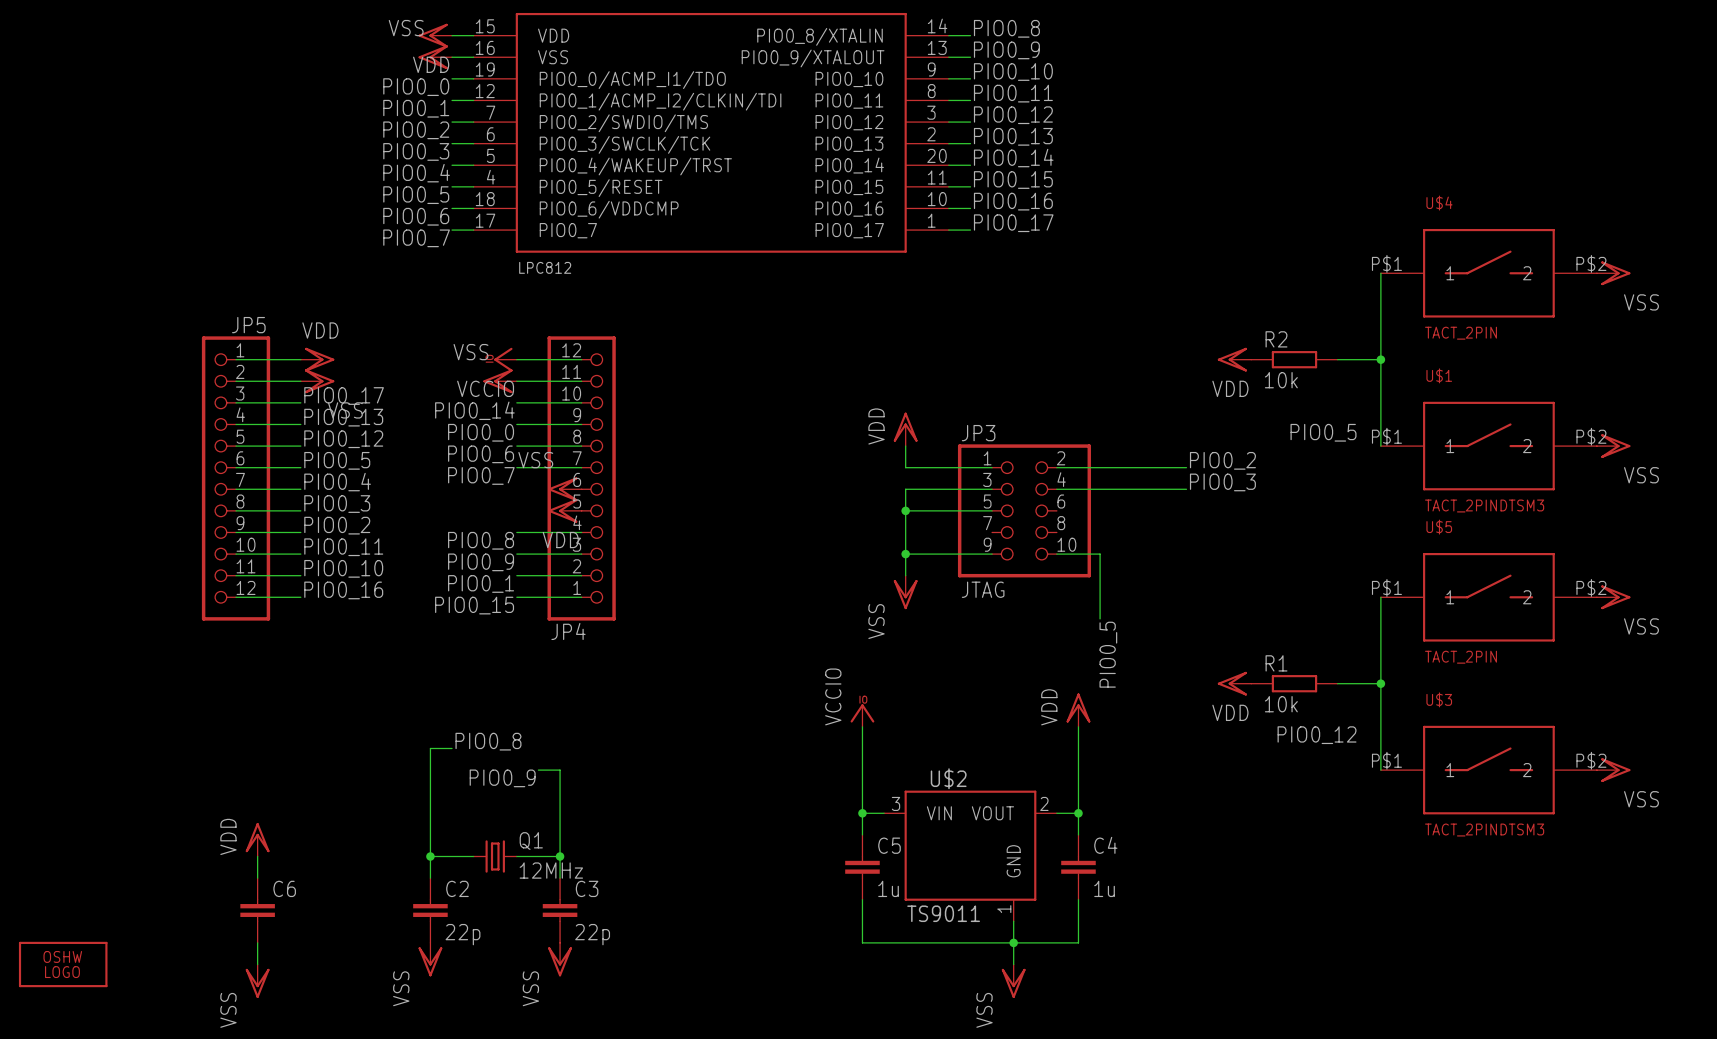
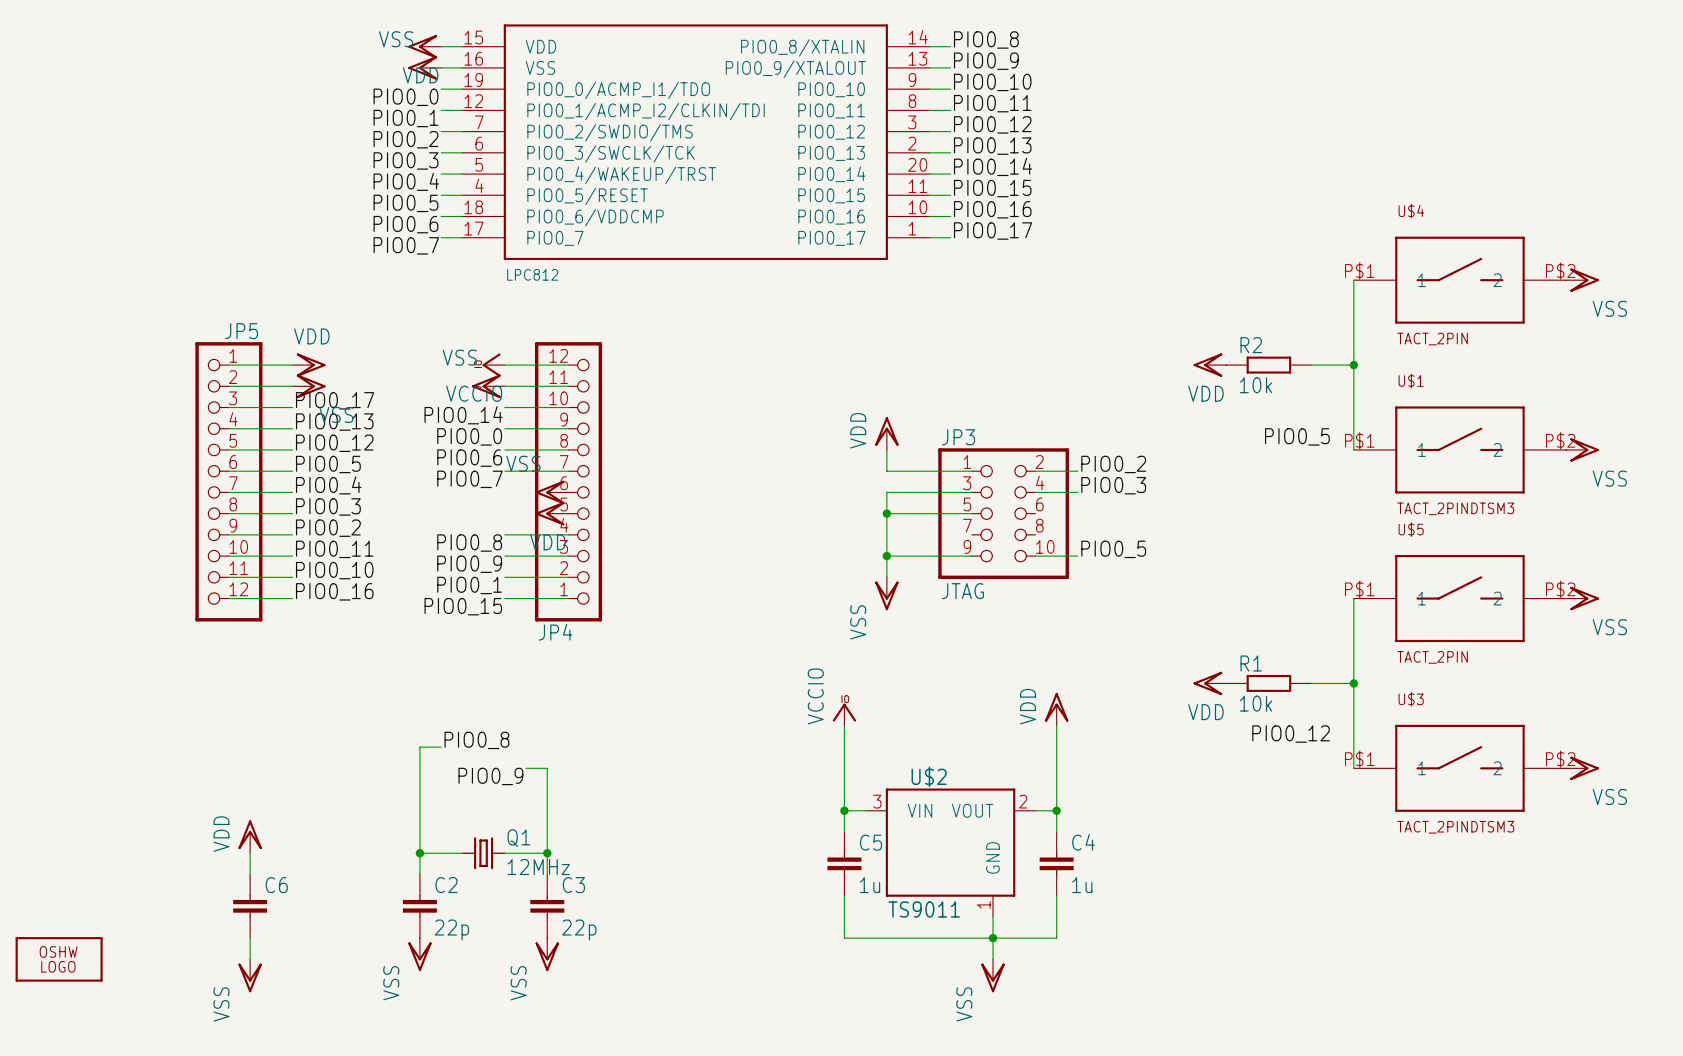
label position: PIO0_2 (1222, 460) -> PIO0_2 (1113, 464)
wire: (1100, 467) (1186, 467) -> none
label position: PIO0_3 (1222, 482) -> PIO0_3 (1113, 485)
wire: (1100, 489) (1186, 489) -> none
wire: (1100, 554) (1100, 618) -> none
label rotation: 0° (1108, 654) -> 90° clockwise (1113, 549)
label position: PIO0_5 (1108, 654) -> PIO0_5 (1113, 549)

